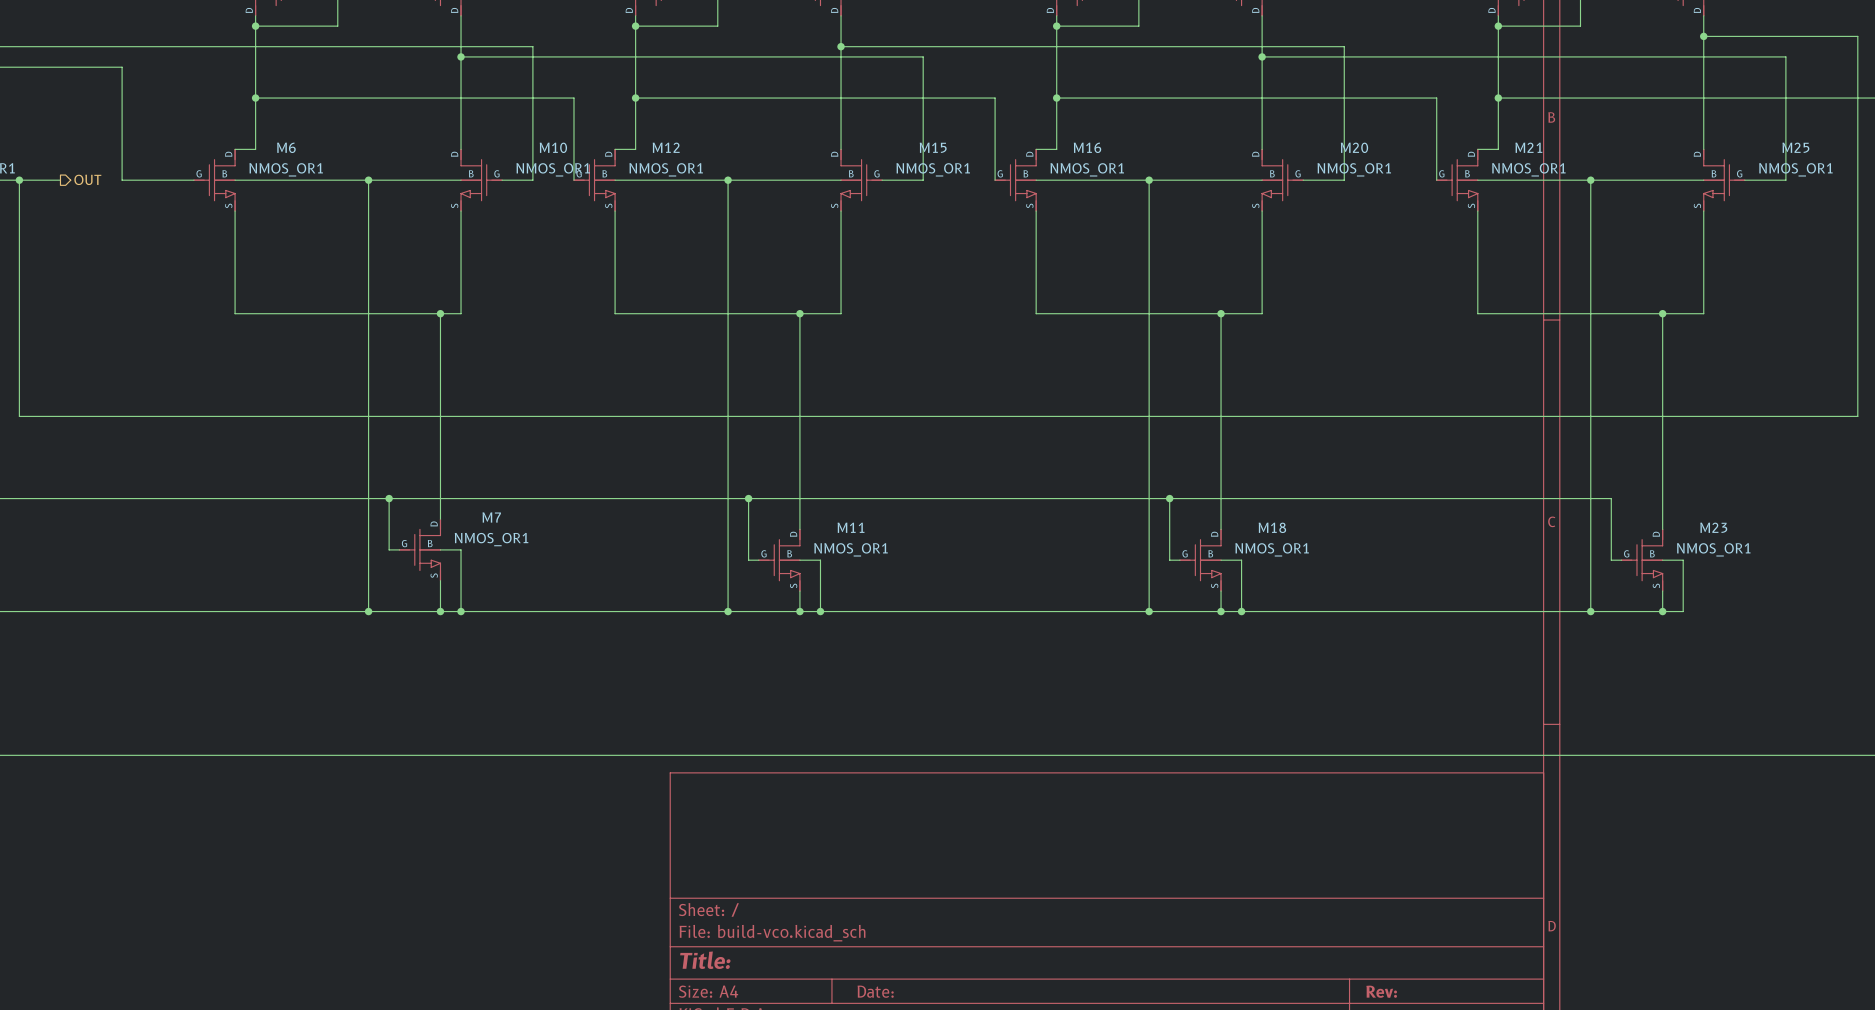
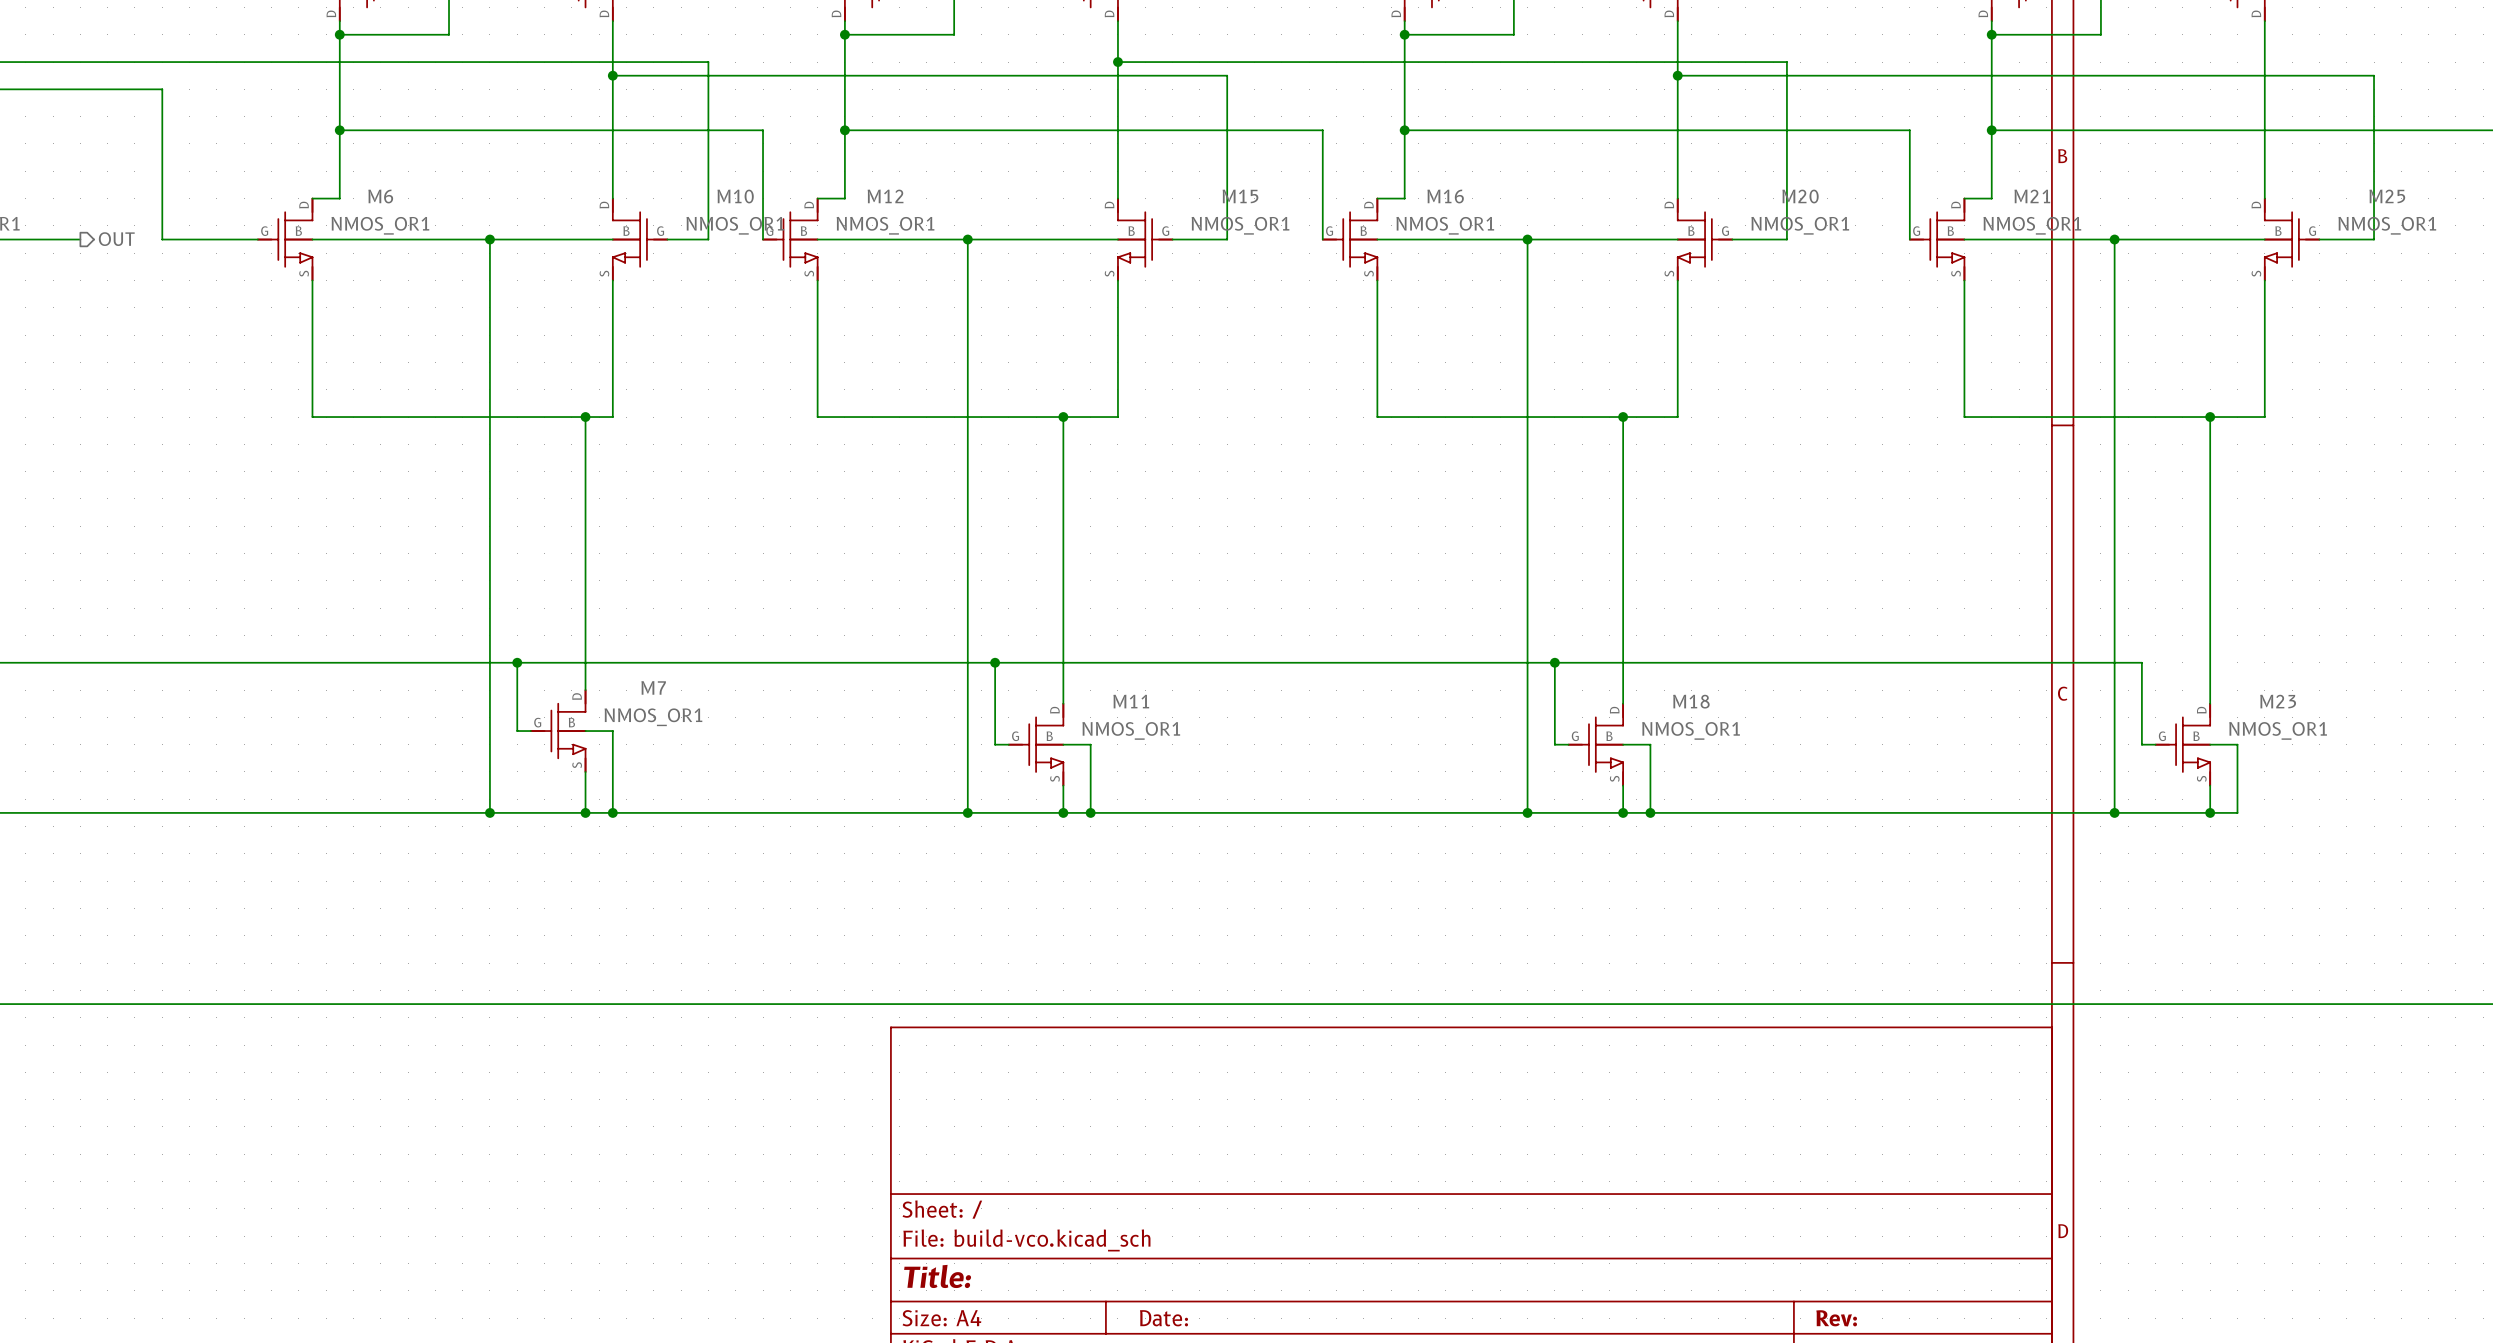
wire: (1703, 36) (1857, 36) (1857, 416) (19, 416) (19, 180) -> none
junction: (1703, 36) -> none
junction: (19, 180) -> none

